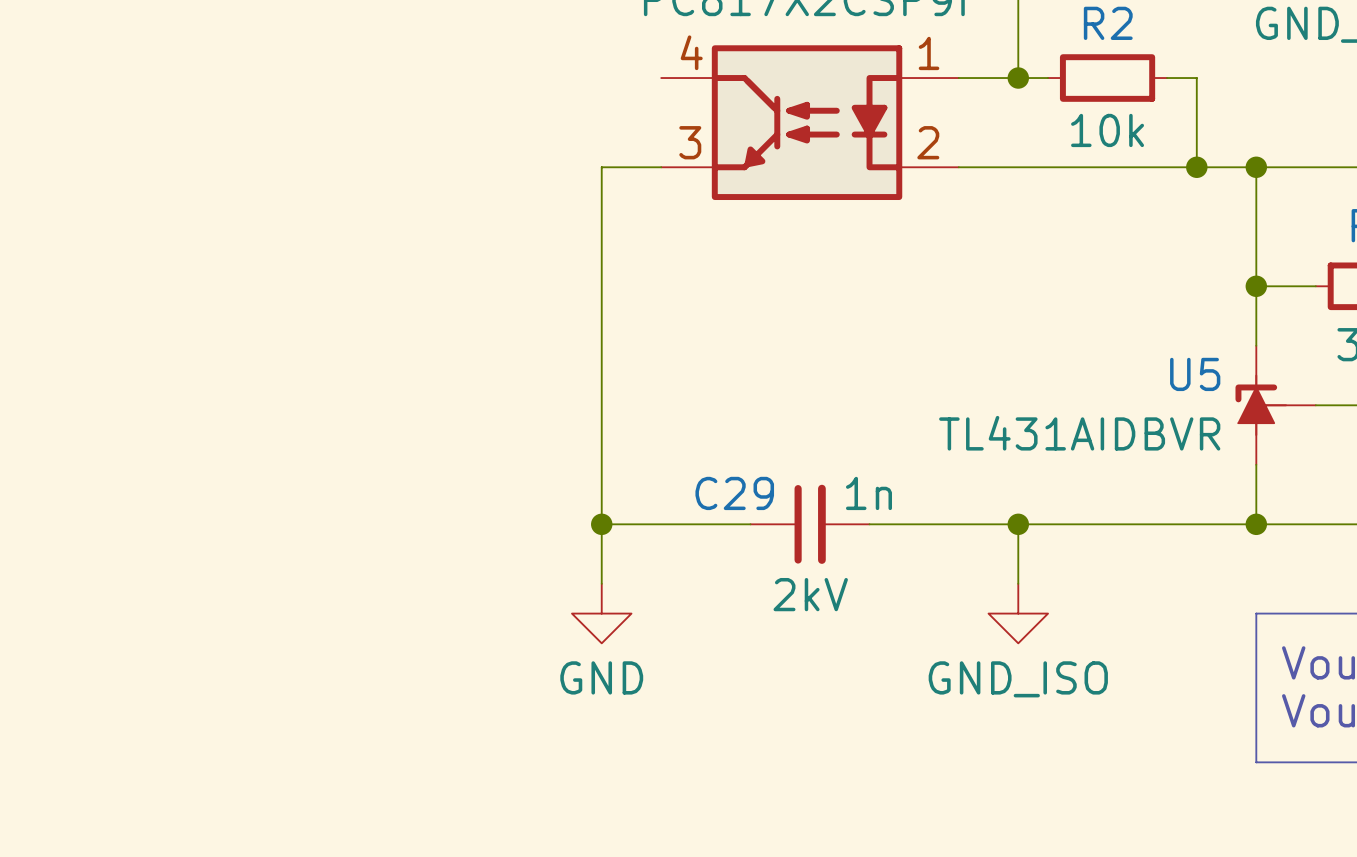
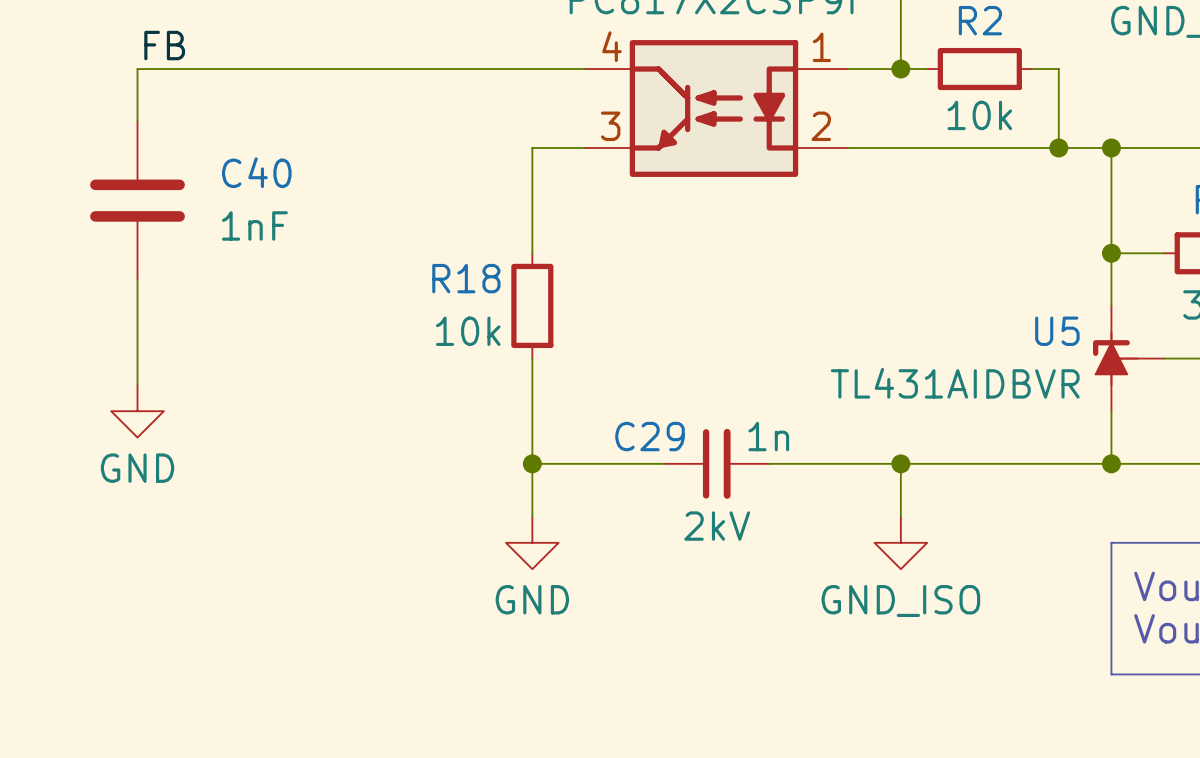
label: none -> FB (164, 45)
wire: none -> (584, 69) (137, 69) (137, 121)
C40: none -> 1nF (137, 200)
wire: (601, 286) (601, 405) -> (137, 279) (137, 384)
R18: none -> (532, 305)
power symbol: none -> GND (137, 411)

